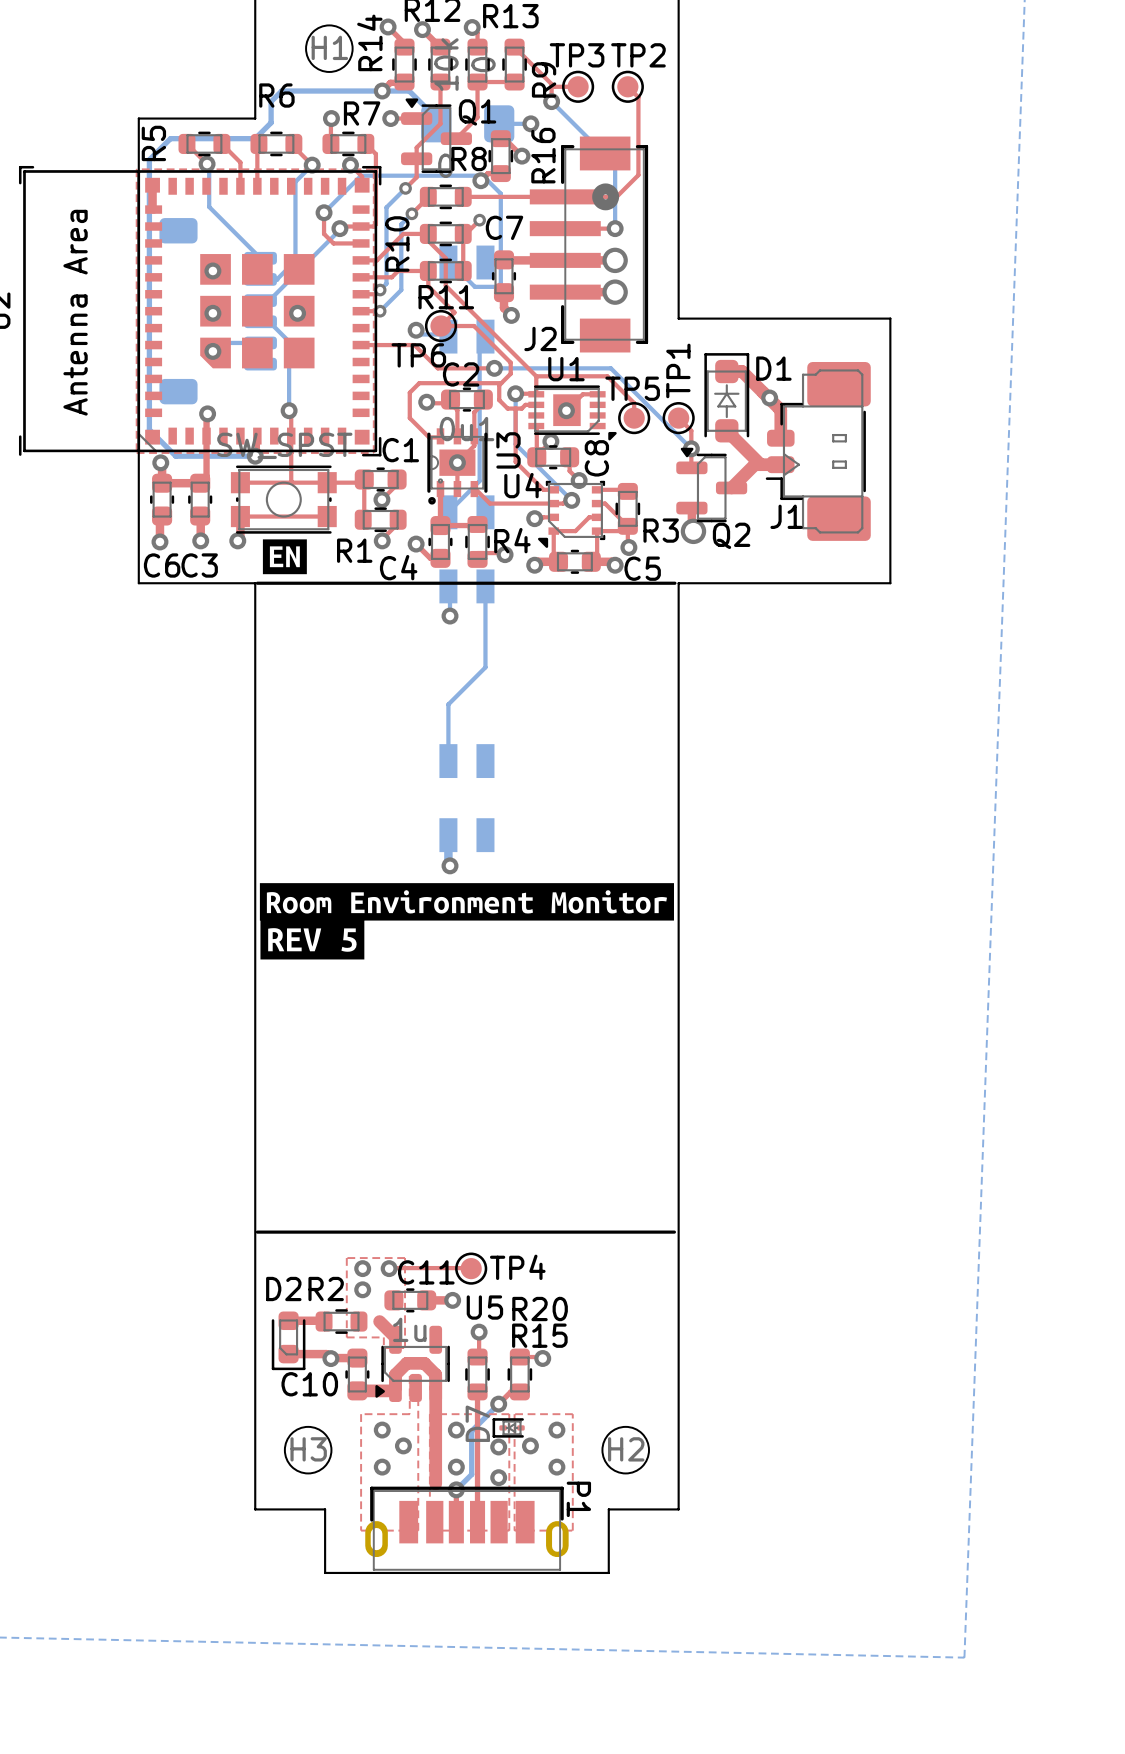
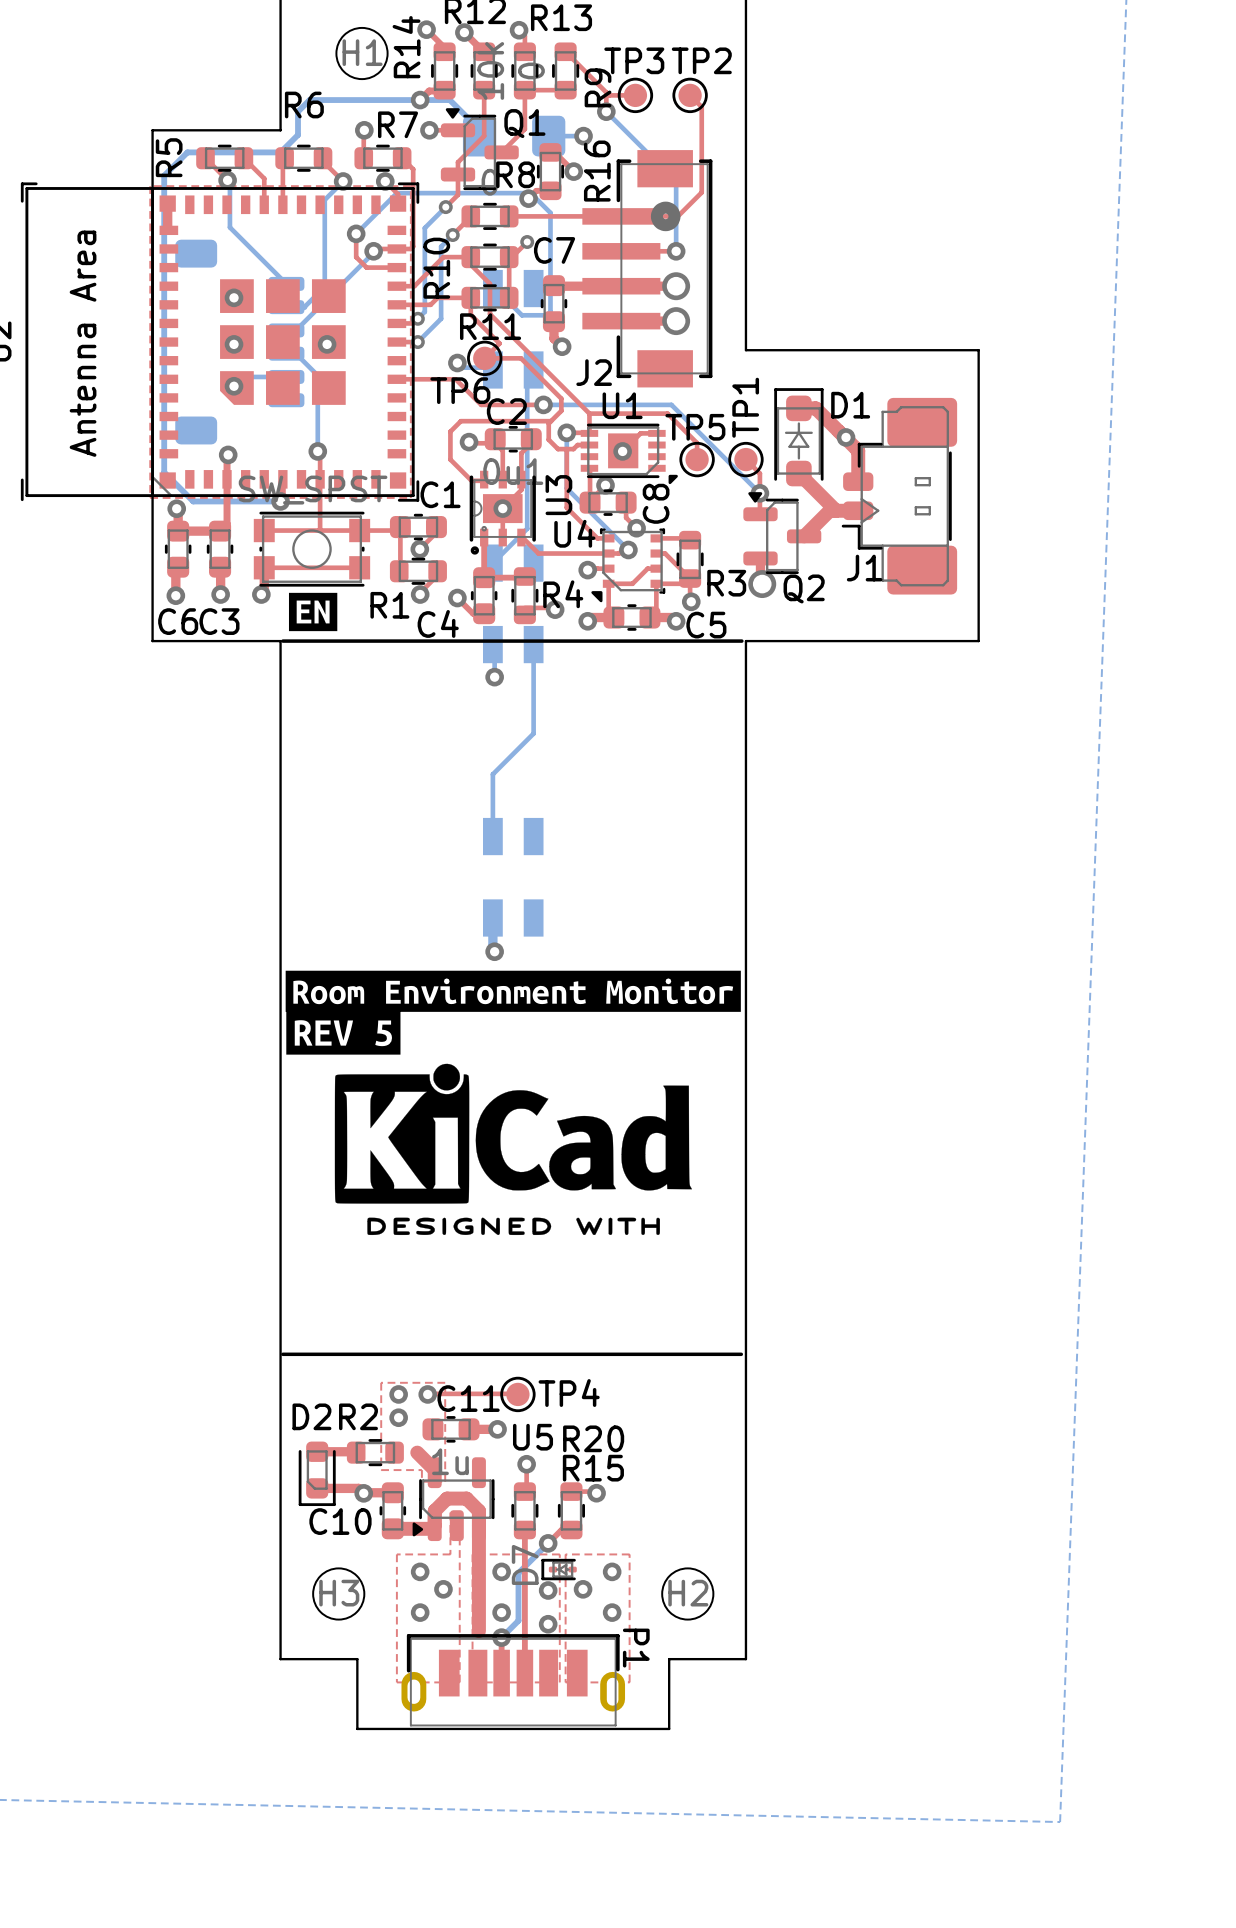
drawing: none -> [334, 1063, 693, 1236]

